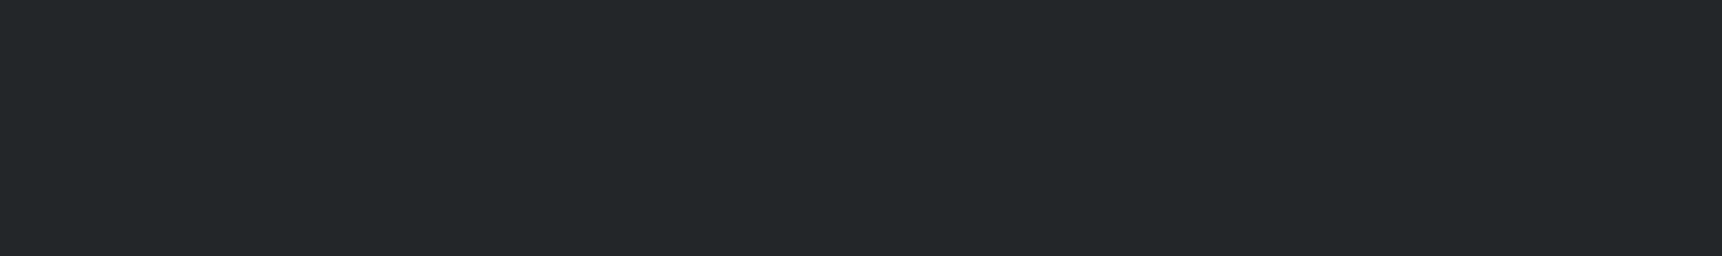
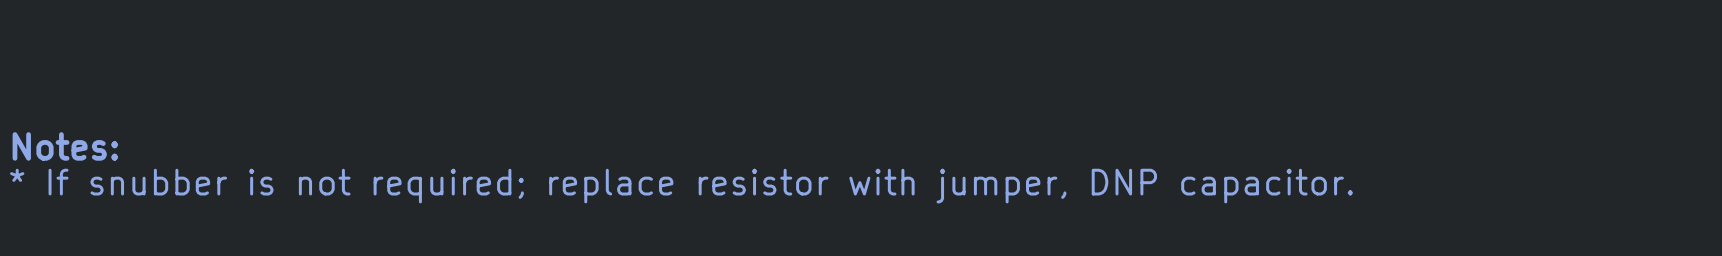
text: none -> Notes: (65, 146)
text: none -> * If snubber is not required; replace resistor with jumper, DNP capacitor. (681, 186)

